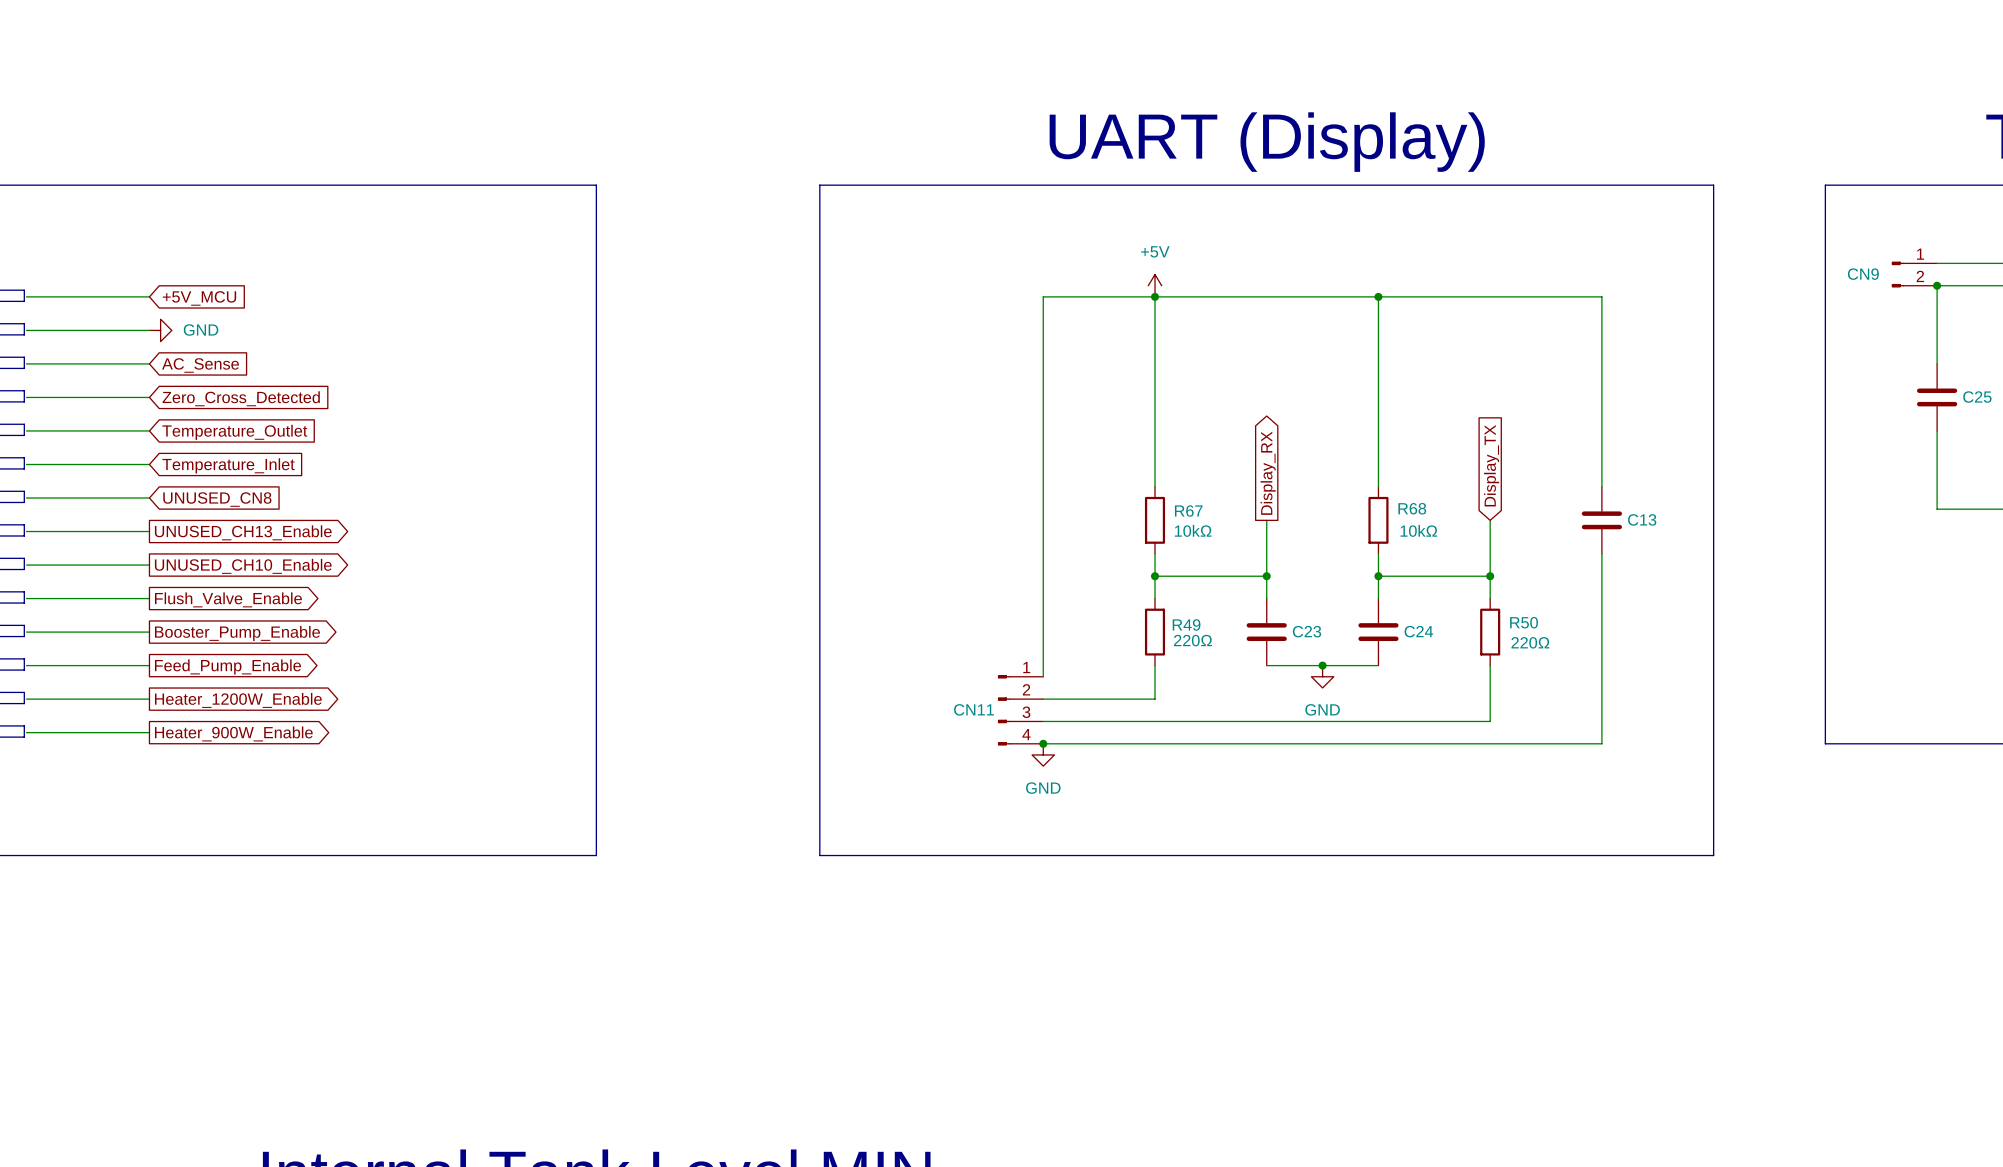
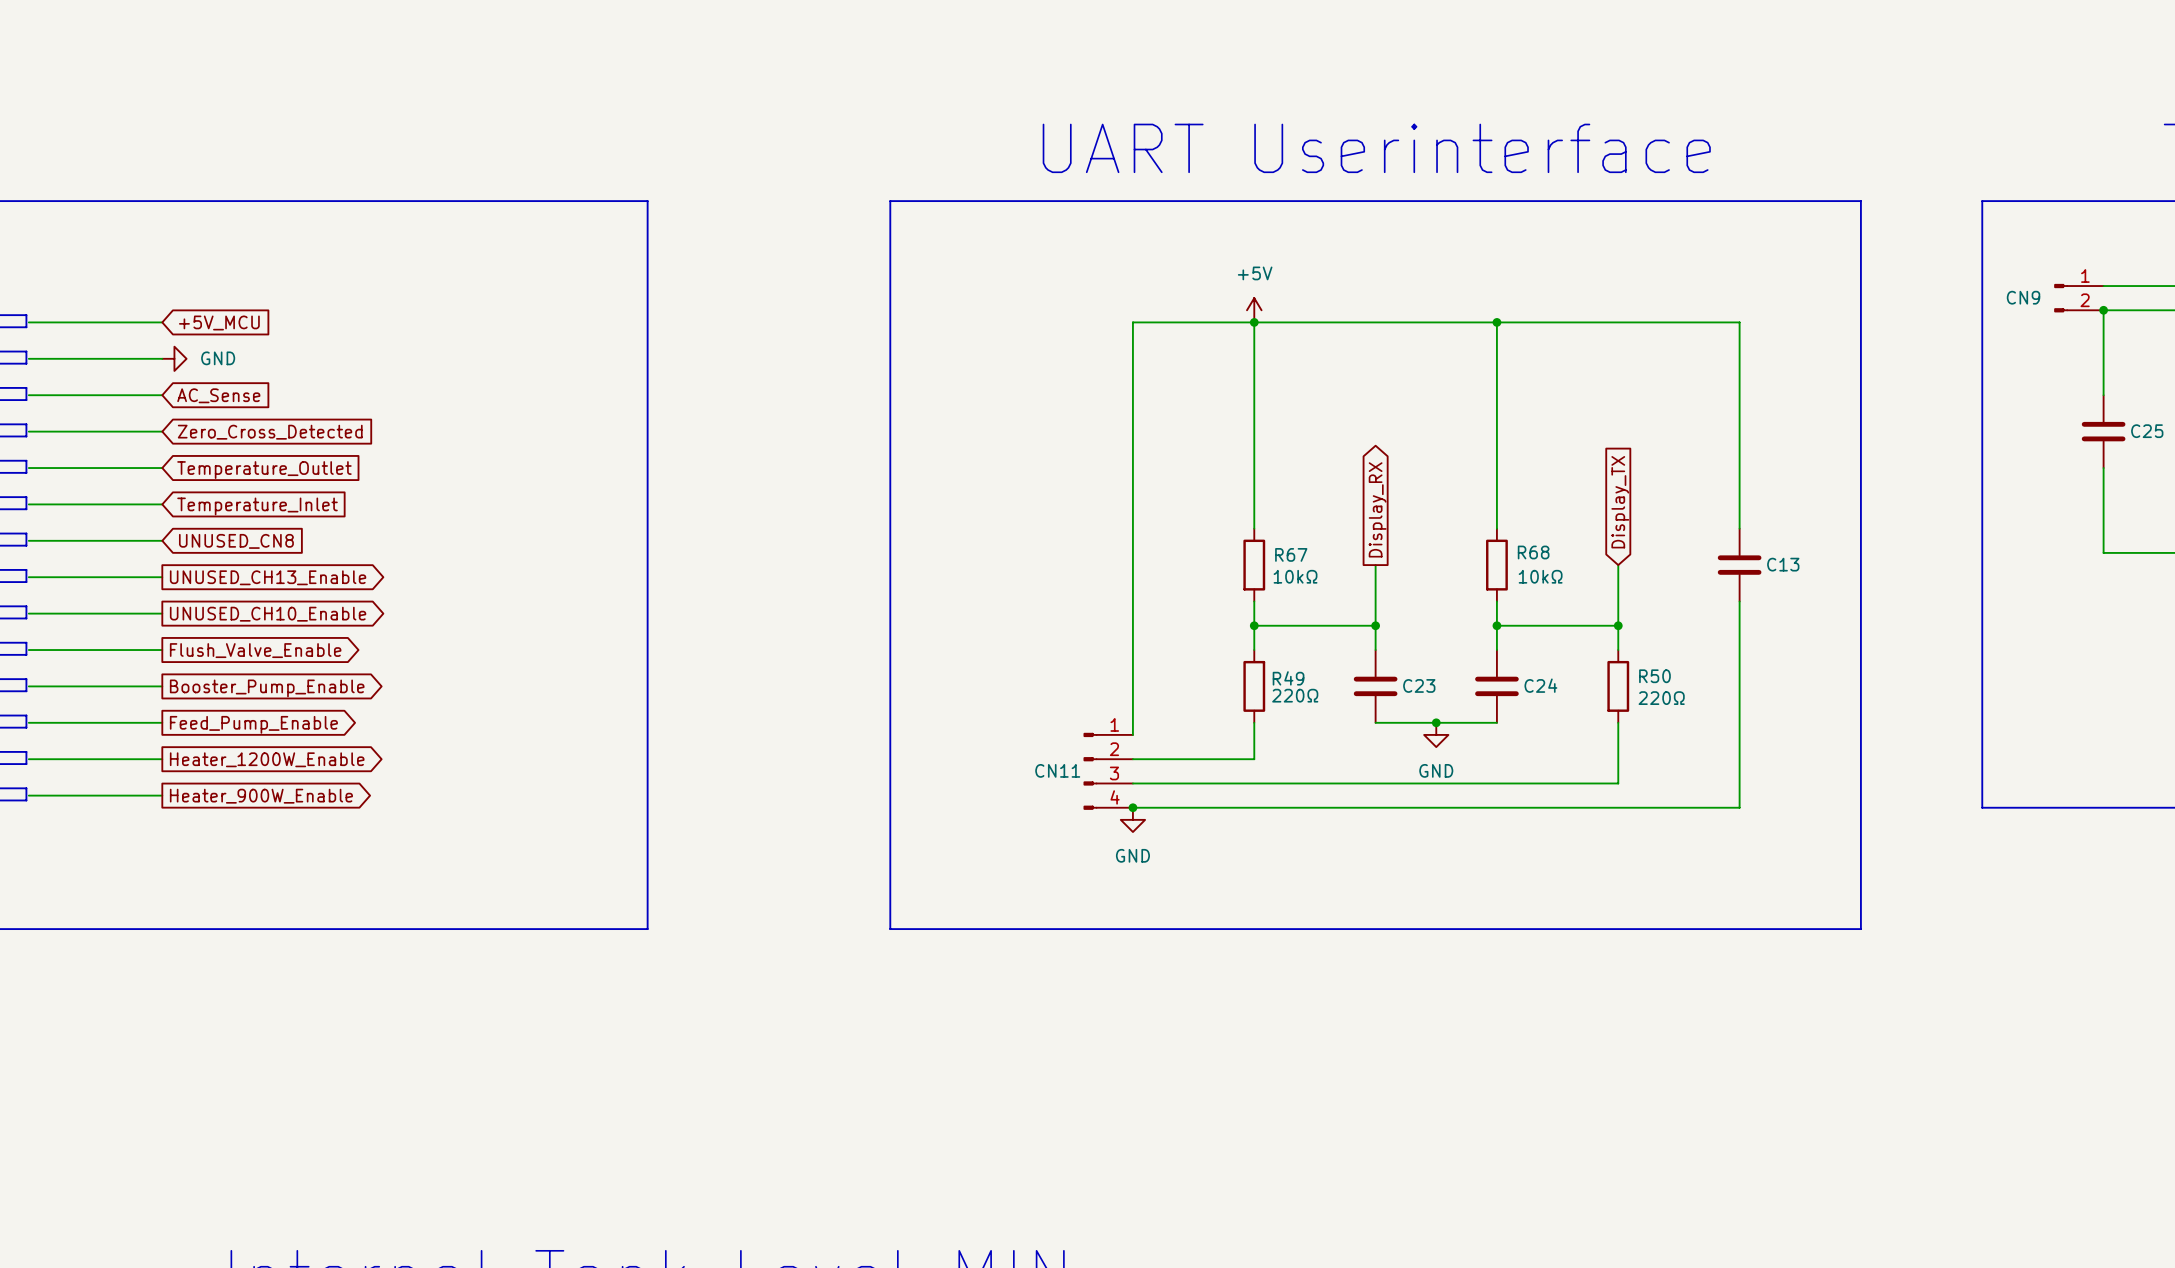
text: UART (Display) (1267, 142) -> UART Userinterface (1376, 148)

